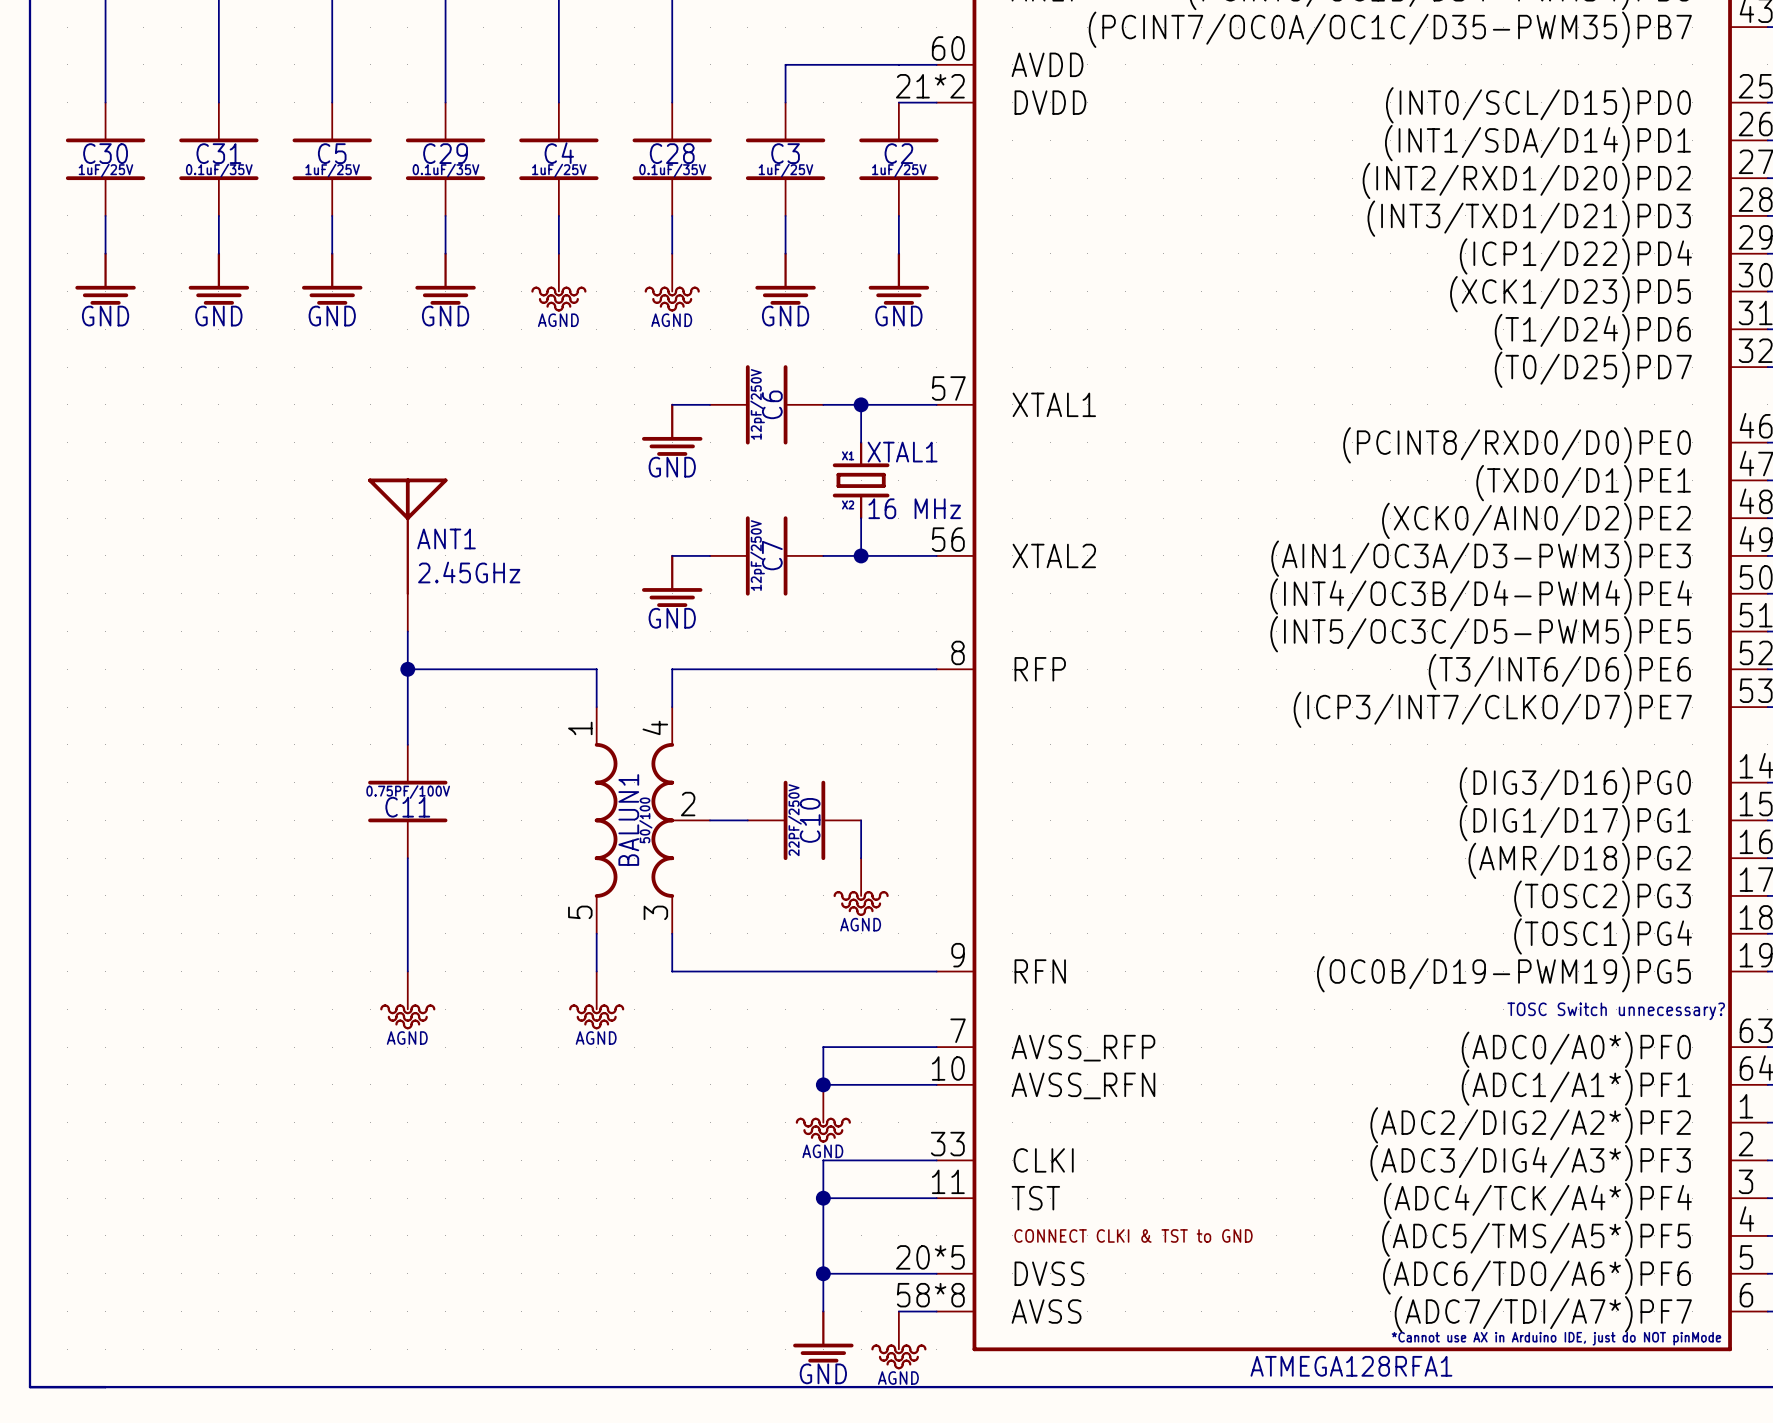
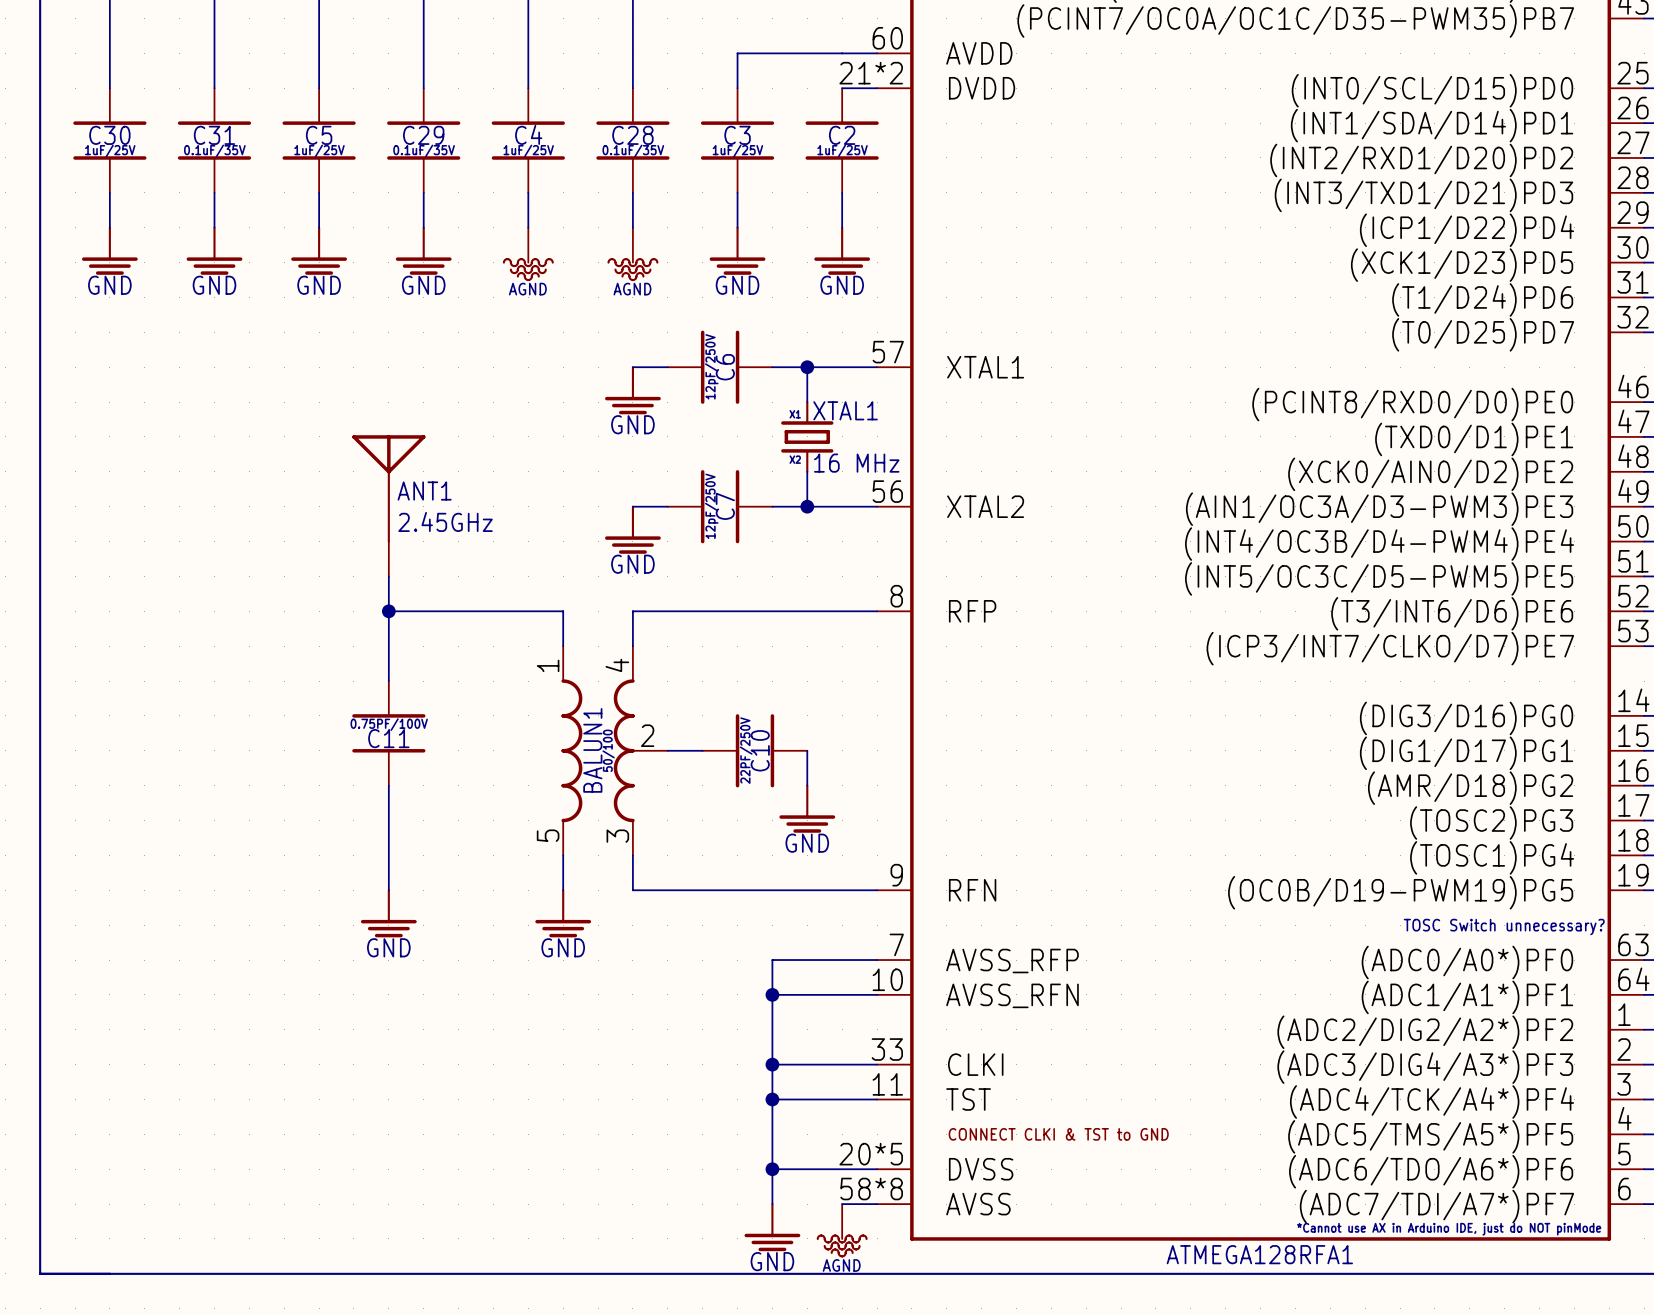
power symbol shape: [833, 858, 889, 916] -> [779, 784, 836, 833]
power symbol shape: [380, 971, 436, 1030] -> [360, 889, 417, 938]
power symbol shape: [569, 971, 625, 1030] -> [535, 889, 592, 938]
power symbol: (823, 1113) -> none
junction: none -> (772, 1064)

